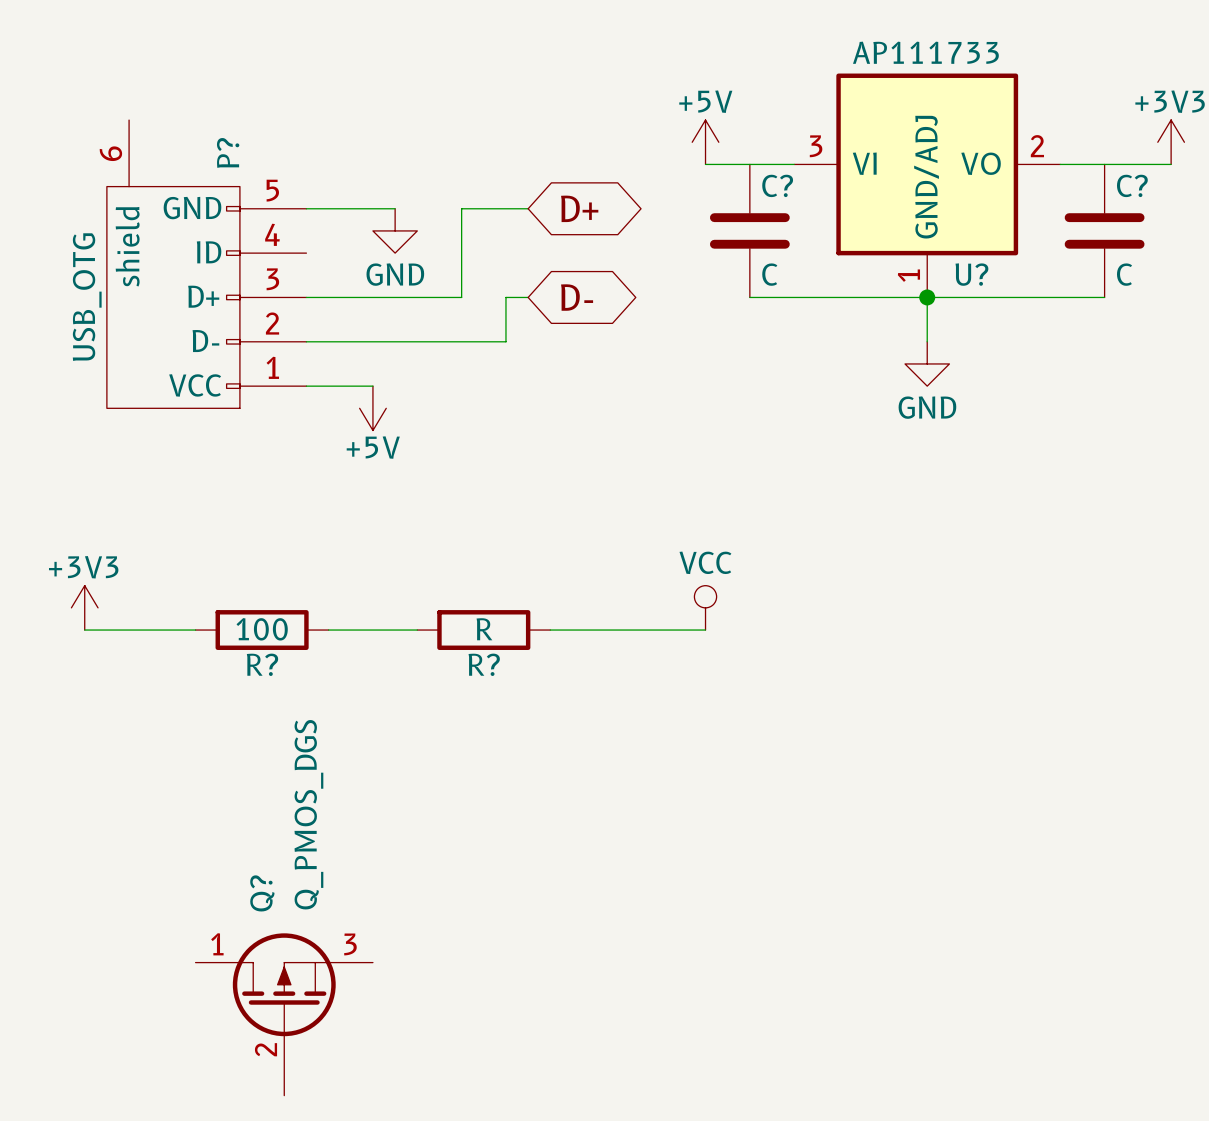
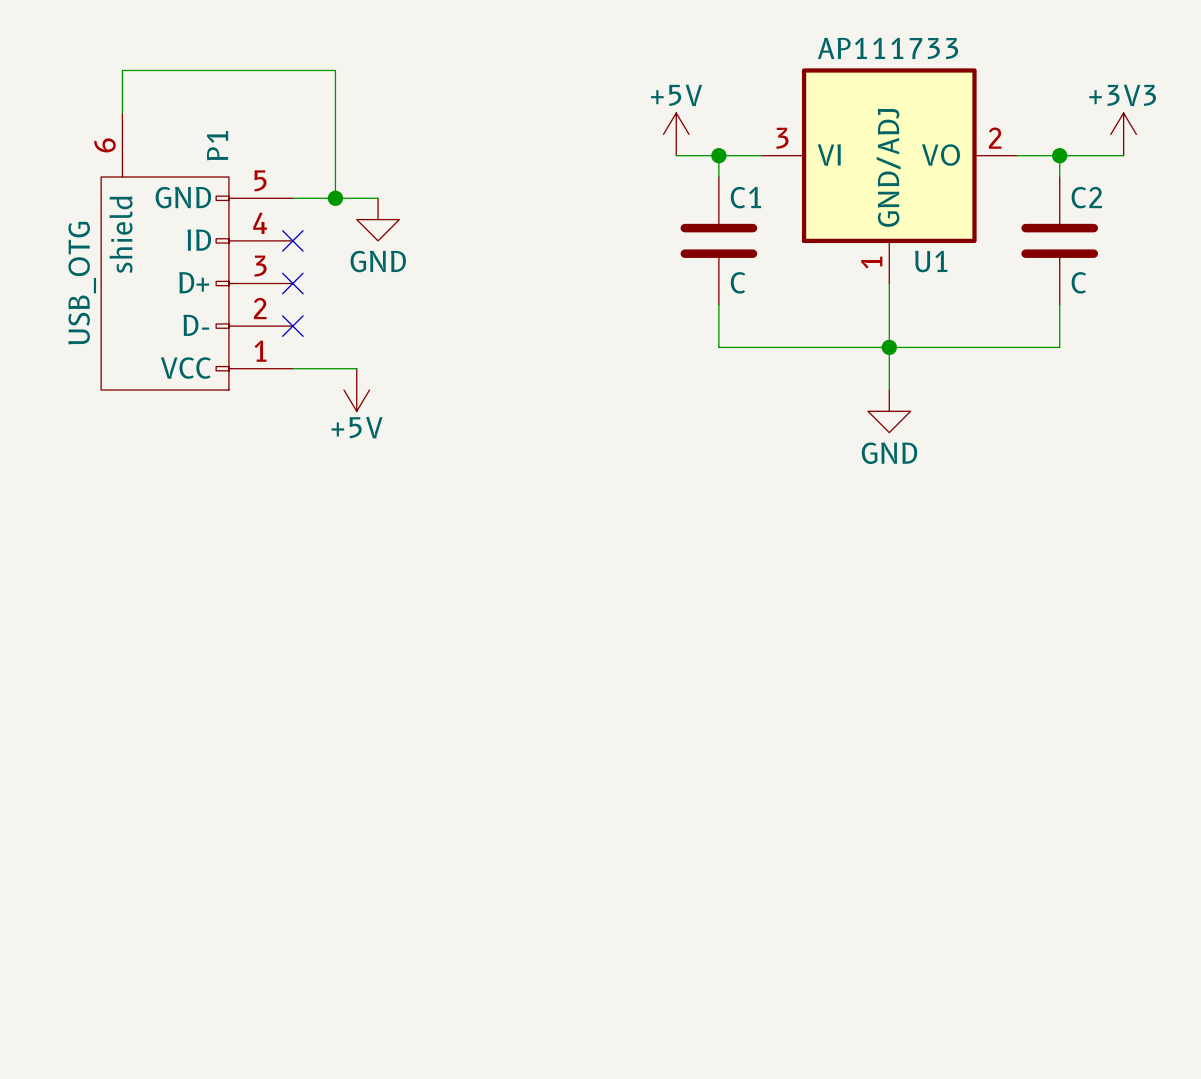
wire: none -> (122, 113) (122, 70) (335, 70) (335, 198)
P? name: P? (228, 152) -> P1 (217, 145)
junction: none -> (718, 155)
junction: none -> (1059, 155)
junction: none -> (335, 198)
wire: (528, 208) (461, 208) (461, 297) (306, 297) -> none
global label: D+ (579, 208) -> none
C?: C (749, 230) -> none
C?: C (1104, 230) -> none
no-connect mark: none -> (292, 240)
C1: none -> C (718, 240)
C2: none -> C (1059, 240)
U? name: U? (971, 274) -> U1 (931, 261)
no-connect mark: none -> (292, 283)
wire: (528, 297) (505, 297) (505, 341) (306, 341) -> none
global label: D- (577, 297) -> none
wire: (749, 297) (1104, 297) -> none
junction position: (927, 297) -> (889, 347)
wire: none -> (718, 304) (718, 347) (1059, 347) (1059, 304)
no-connect mark: none -> (292, 326)
wire: none -> (889, 326) (889, 390)
power symbol position: GND (927, 363) -> GND (889, 411)
power symbol: +3V3 (84, 607) -> none
power symbol: VCC (705, 607) -> none
wire: (84, 630) (195, 630) -> none
R?: 100 (262, 630) -> none
wire: (328, 630) (417, 630) -> none
R?: R (483, 630) -> none
wire: (550, 630) (705, 630) -> none
Q?: Q_PMOS_DGS (284, 1014) -> none

